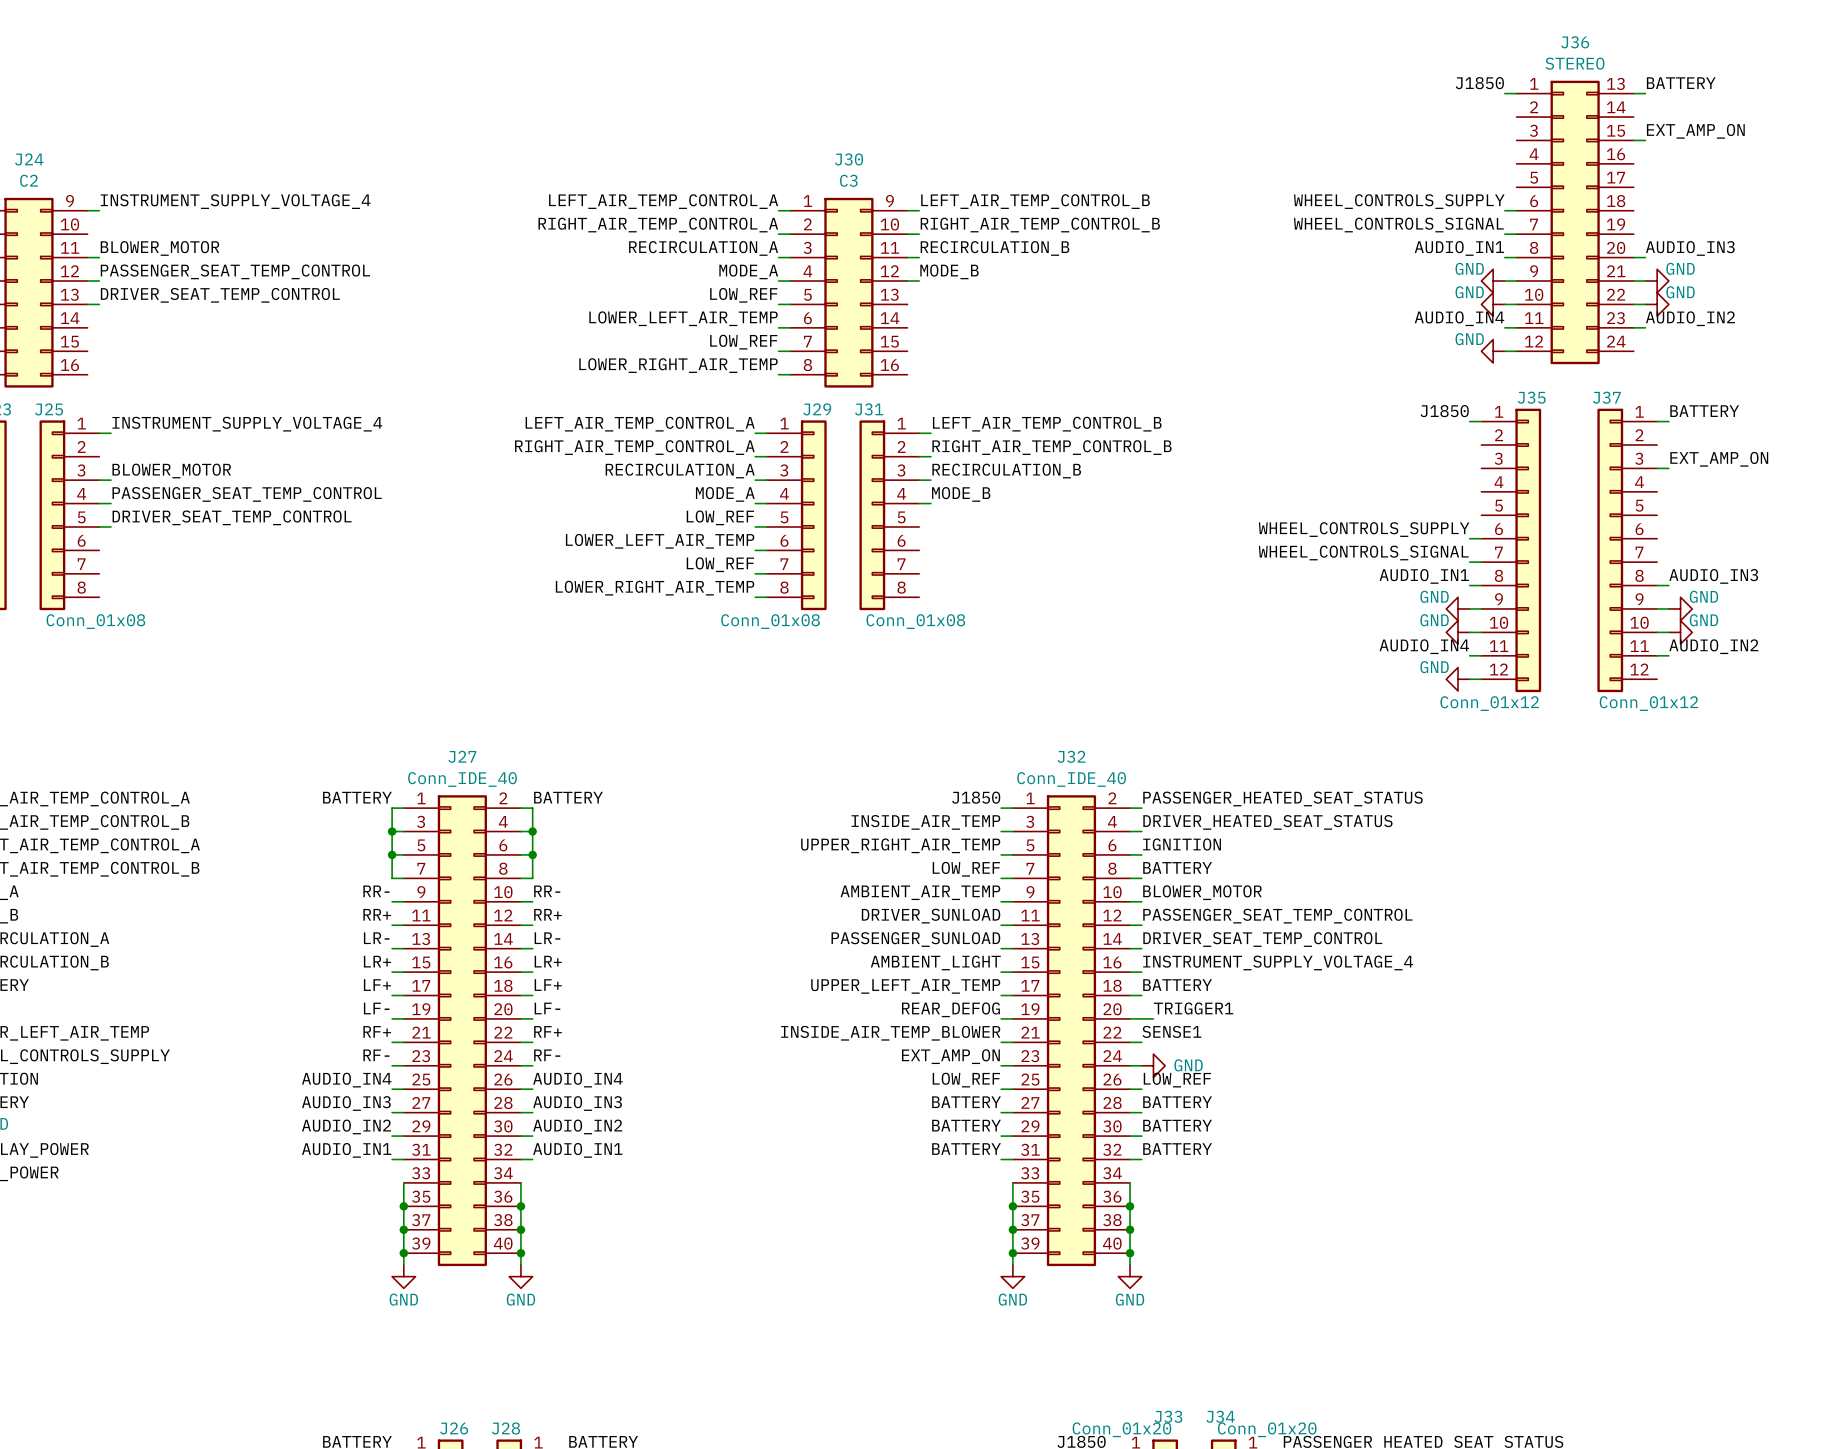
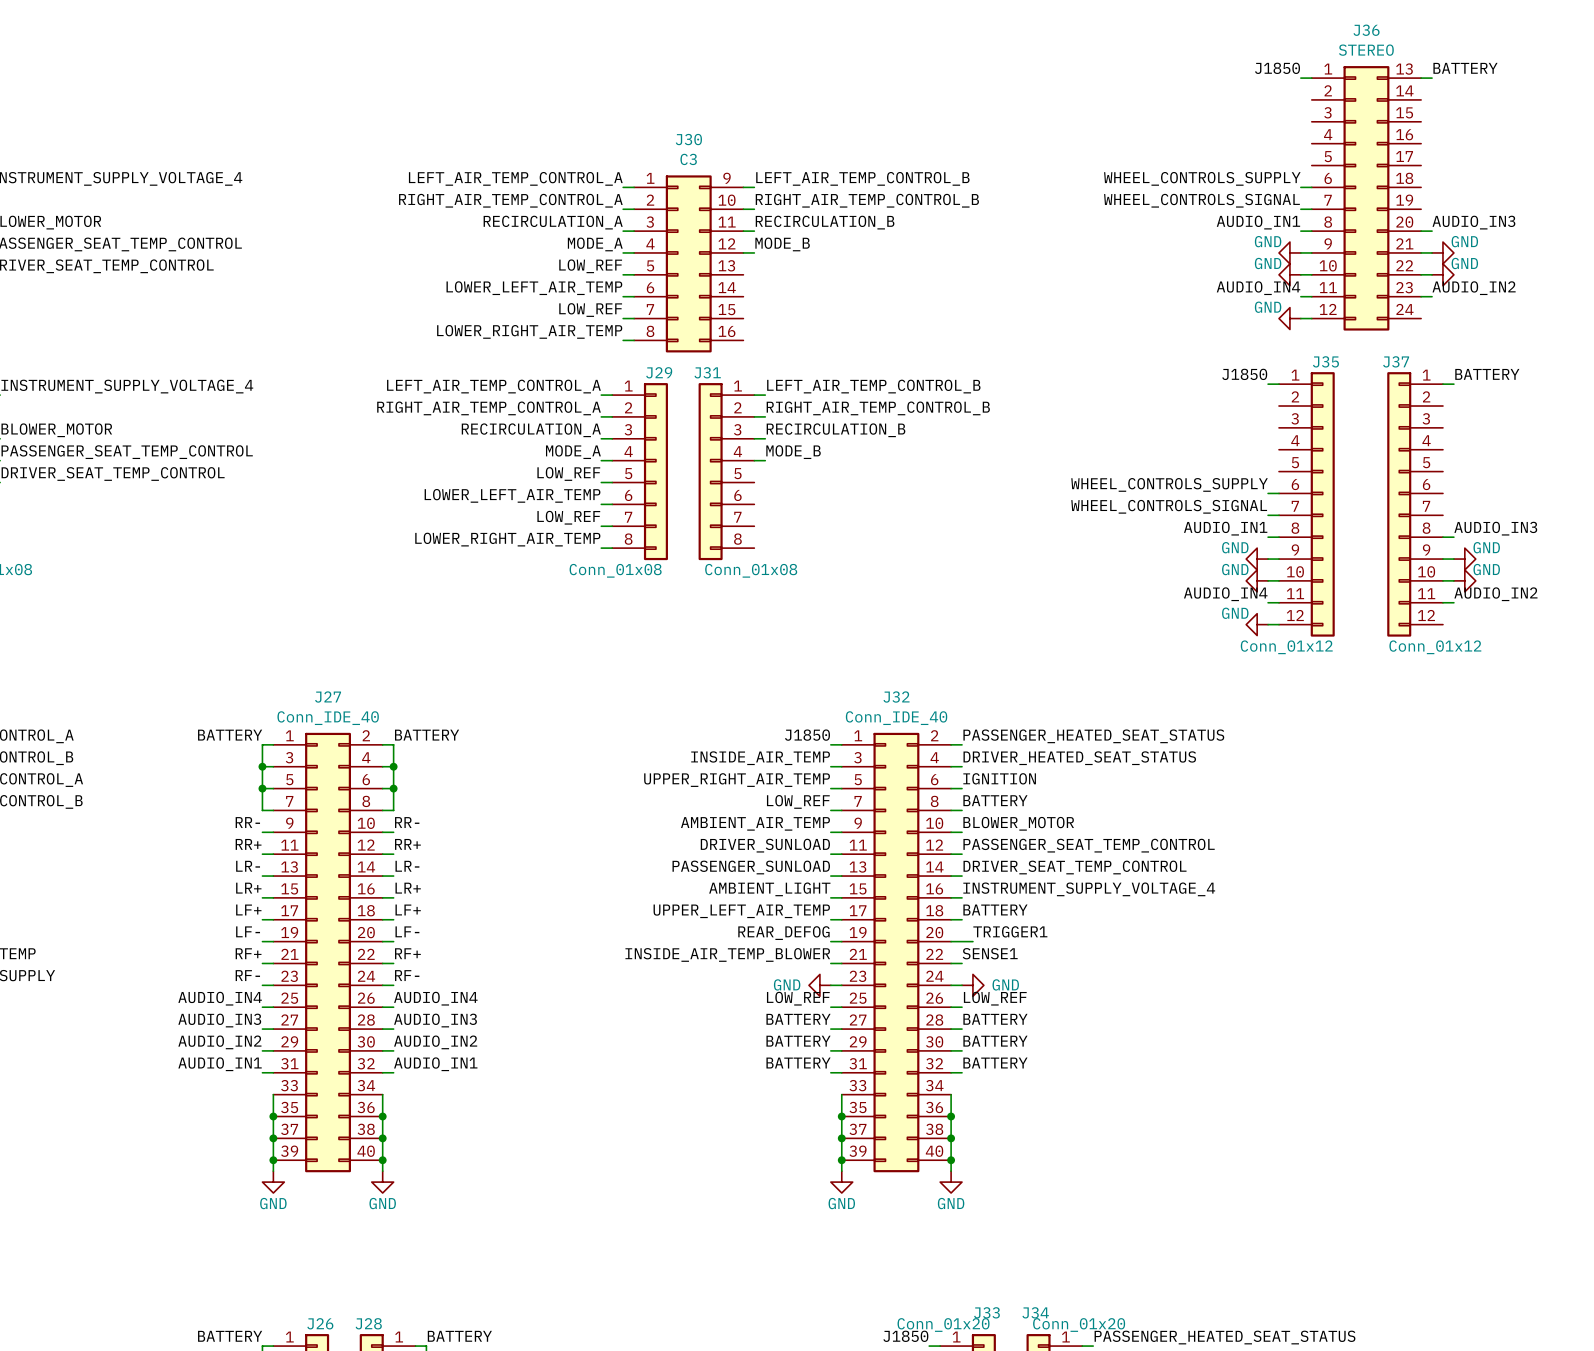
label: EXT_AMP_ON (1695, 131) -> none
wire: (1633, 140) (1645, 140) -> none
label: EXT_AMP_ON (1719, 459) -> none
wire: (1657, 468) (1668, 468) -> none
label: EXT_AMP_ON (950, 1056) -> none
power symbol: none -> GND (819, 985)

